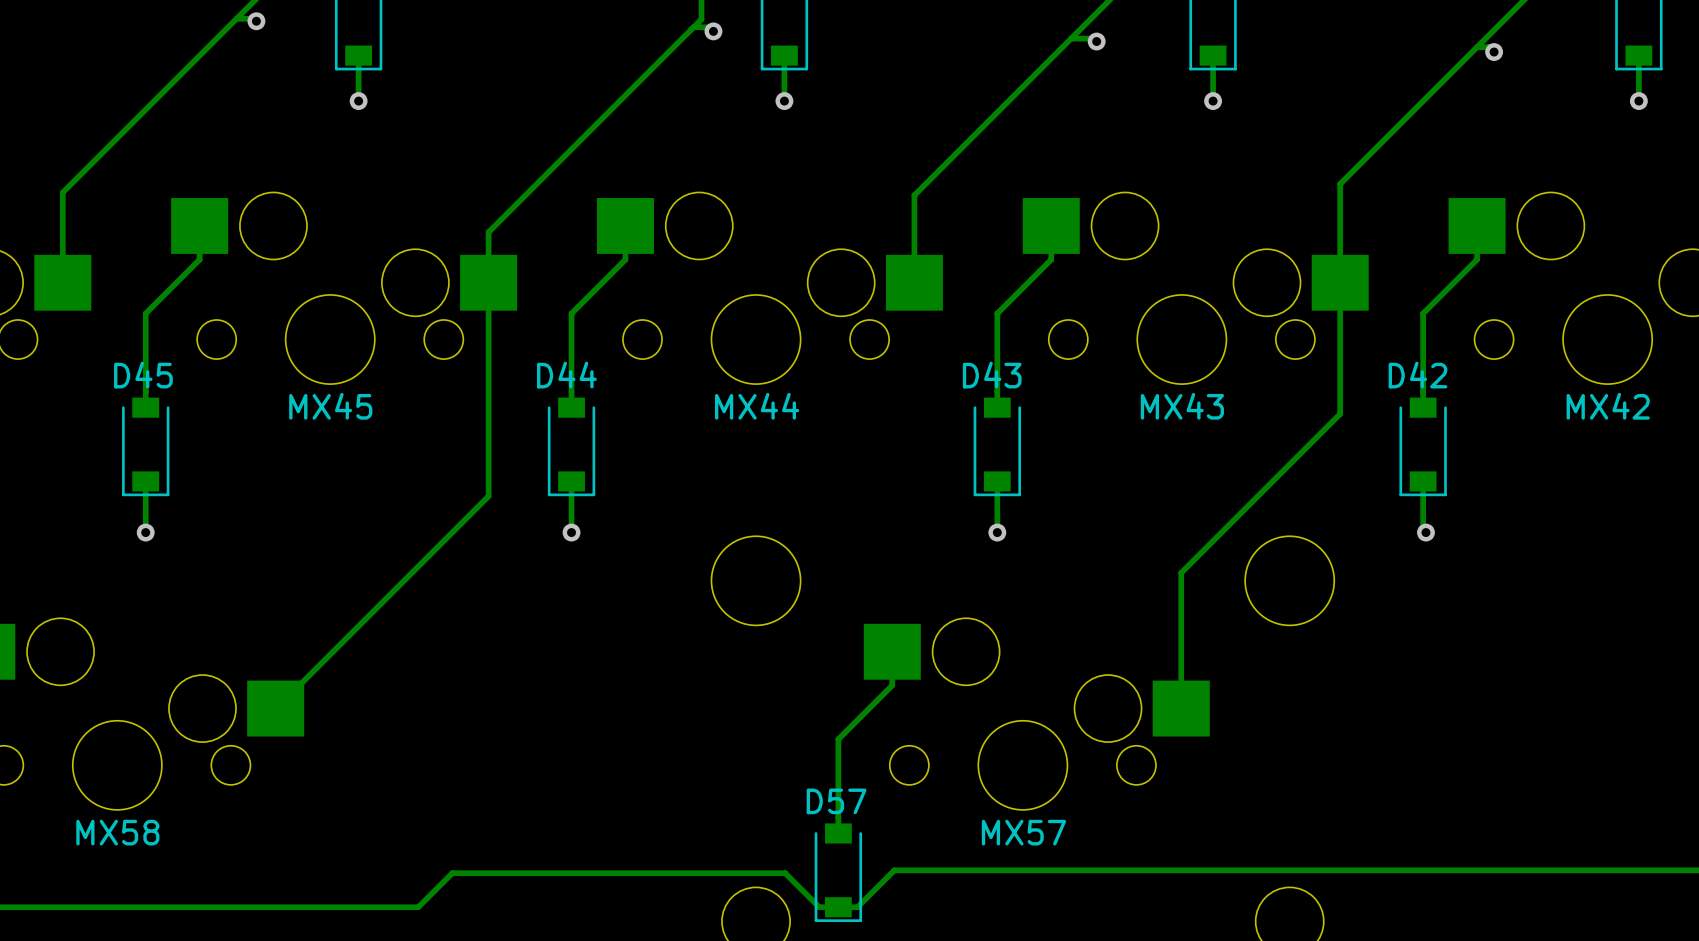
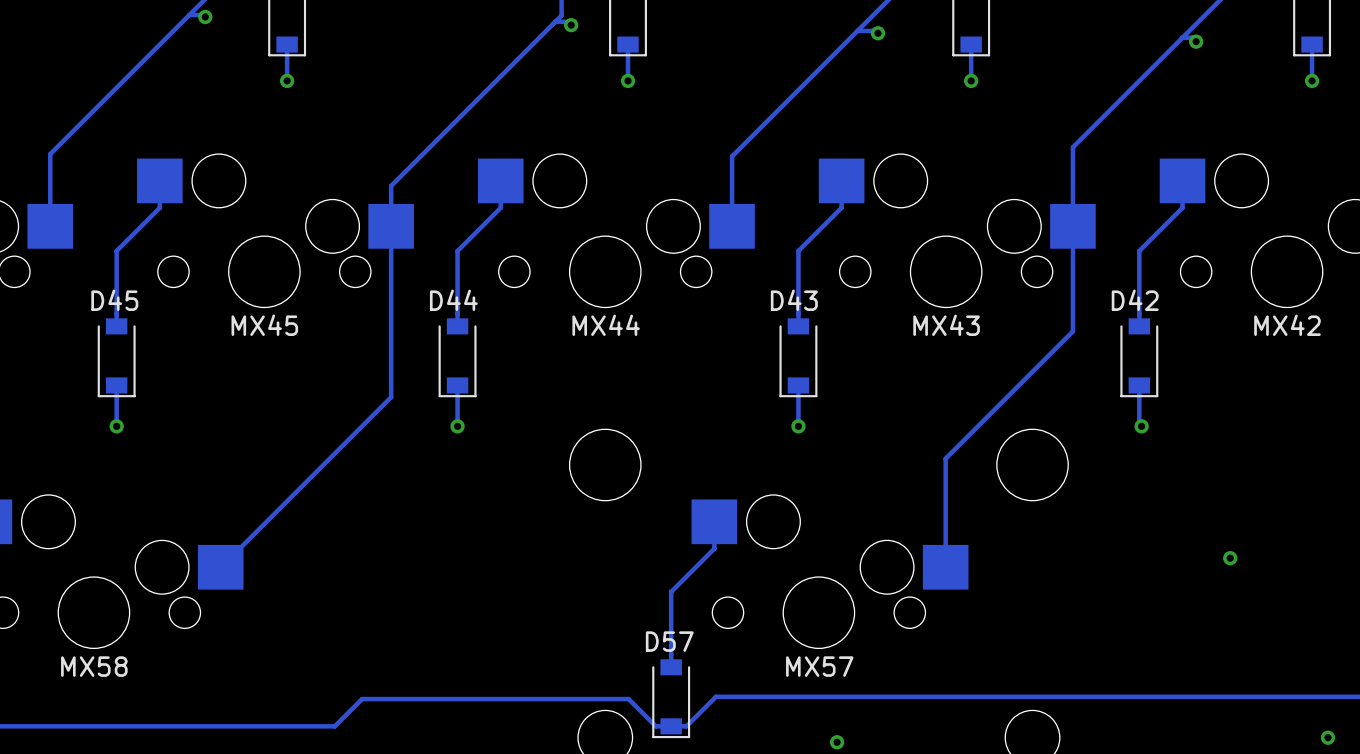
via: none -> (1230, 558)
via: none -> (1327, 737)
via: none -> (837, 742)

